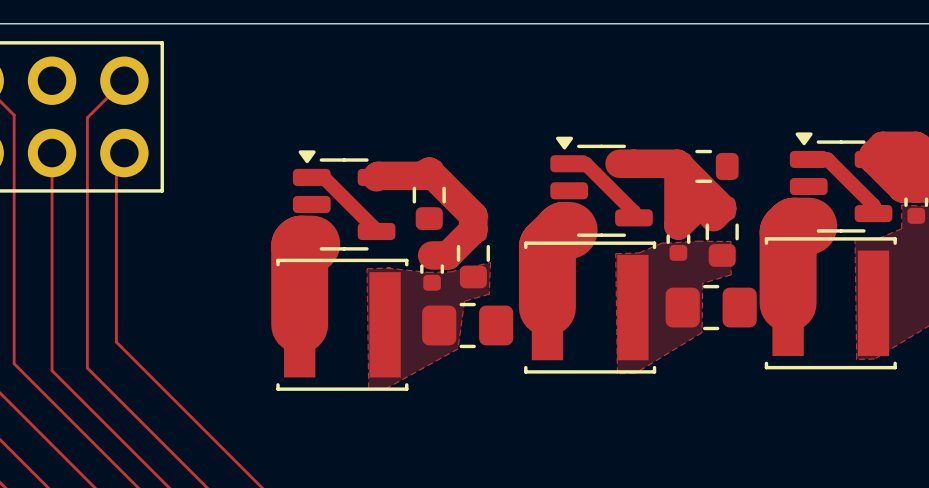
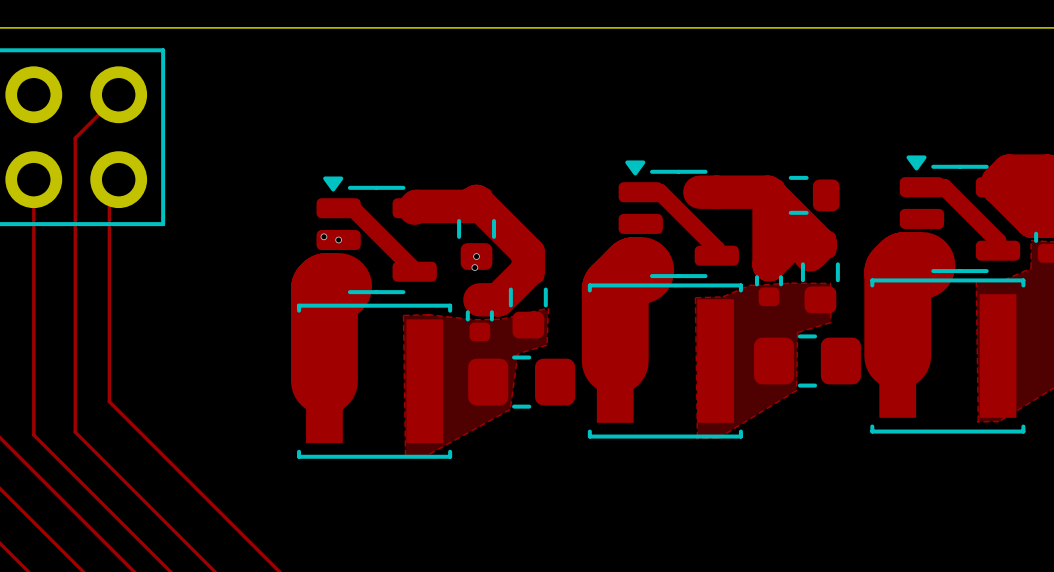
via: none -> (323, 236)
via: none -> (338, 239)
via: none -> (476, 256)
via: none -> (474, 267)

